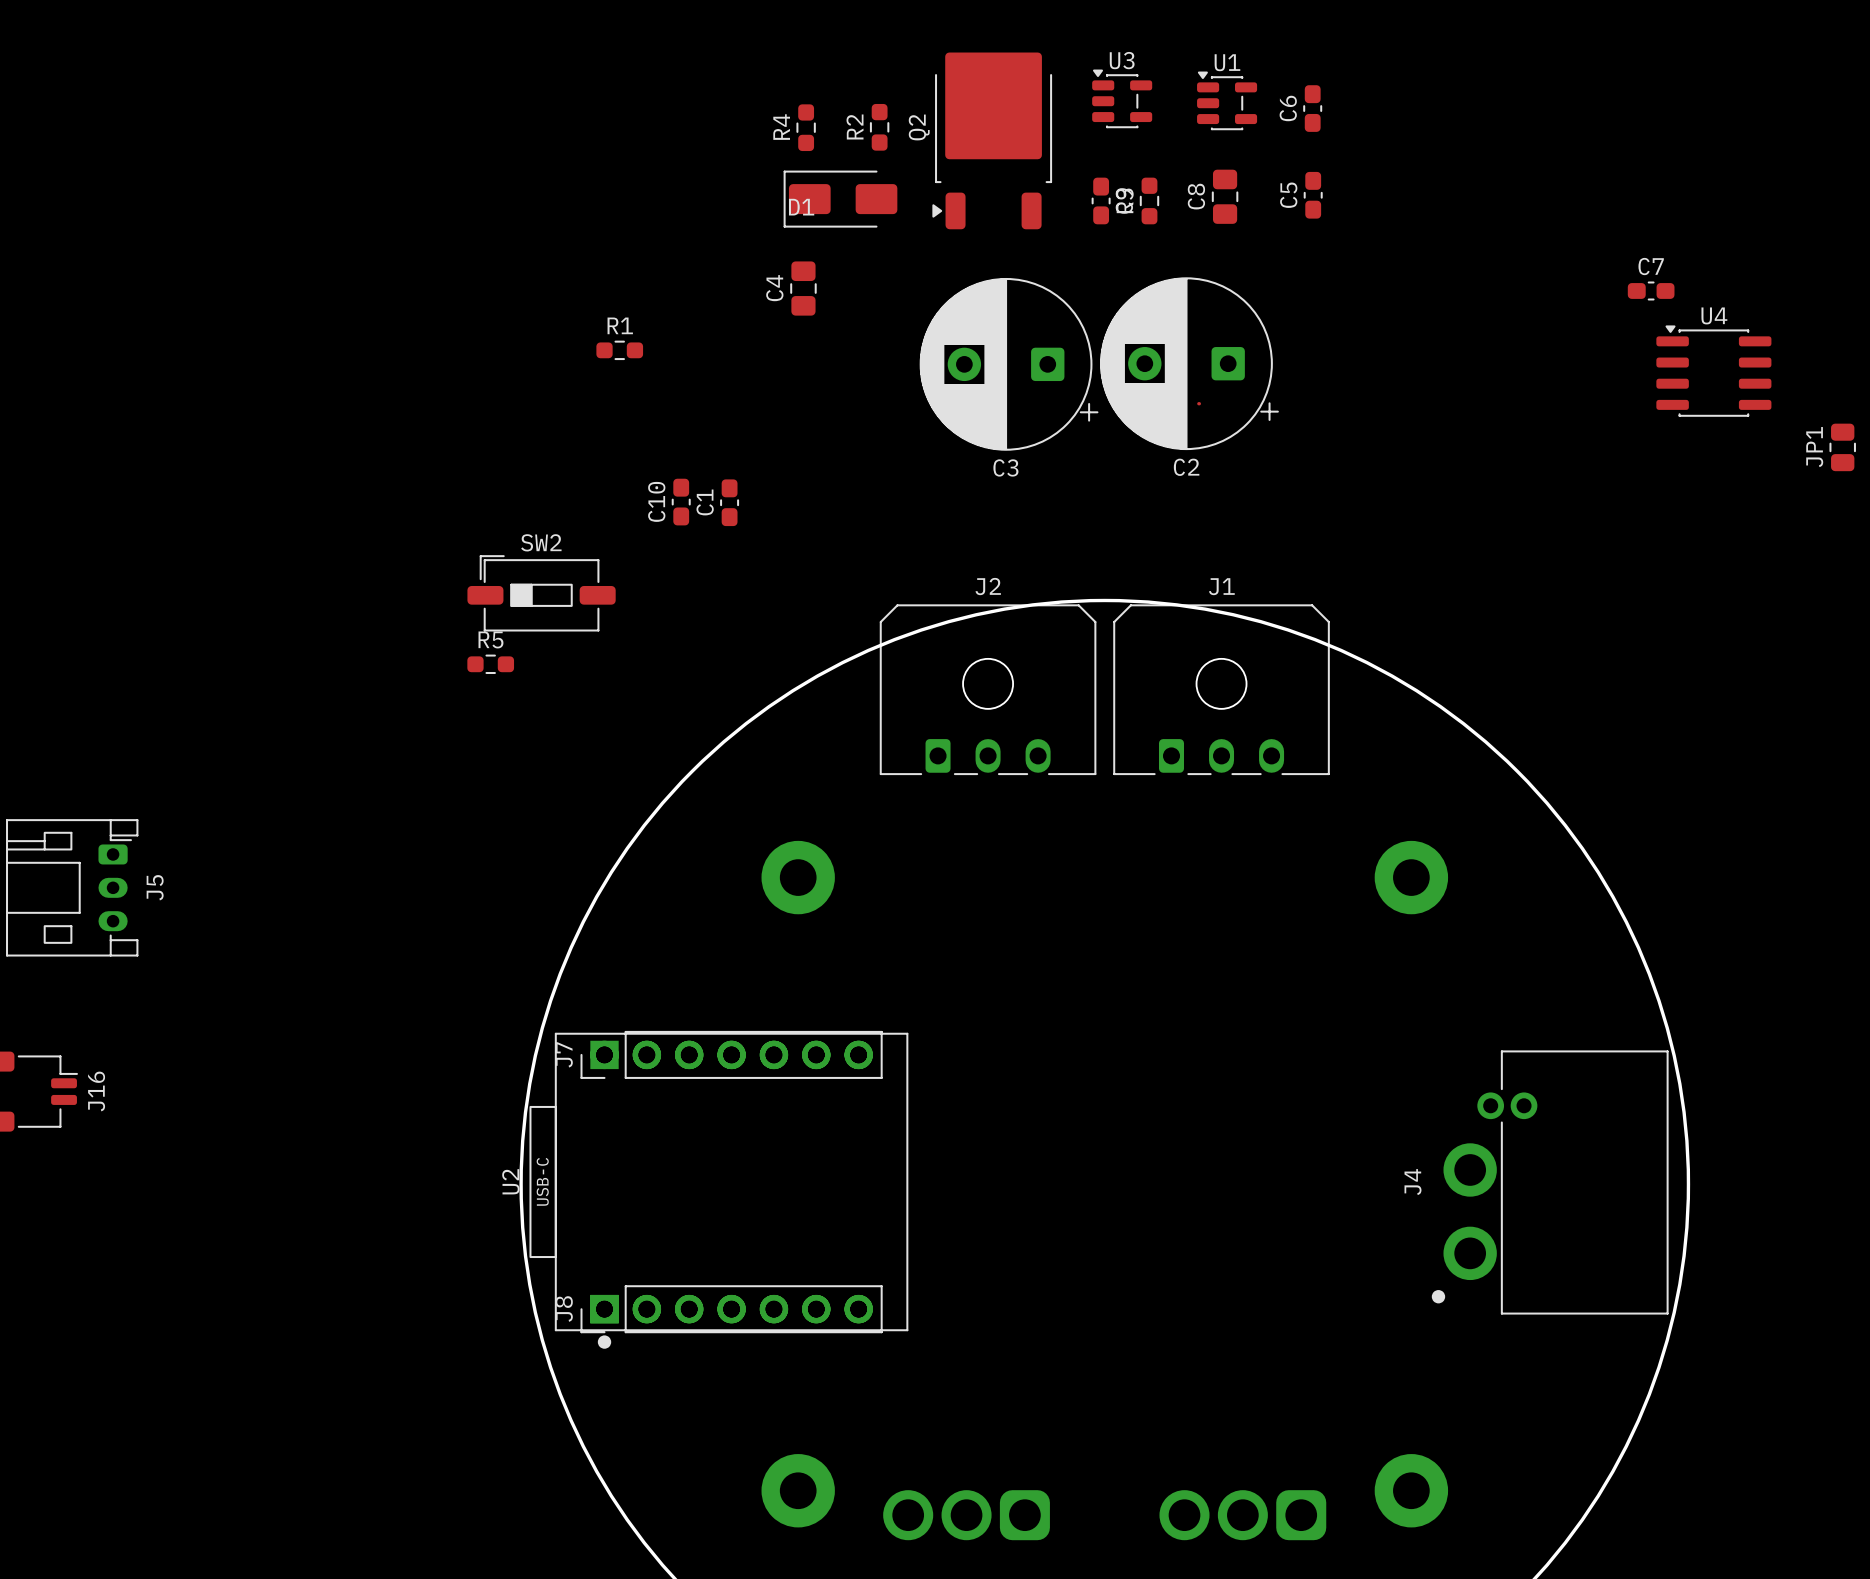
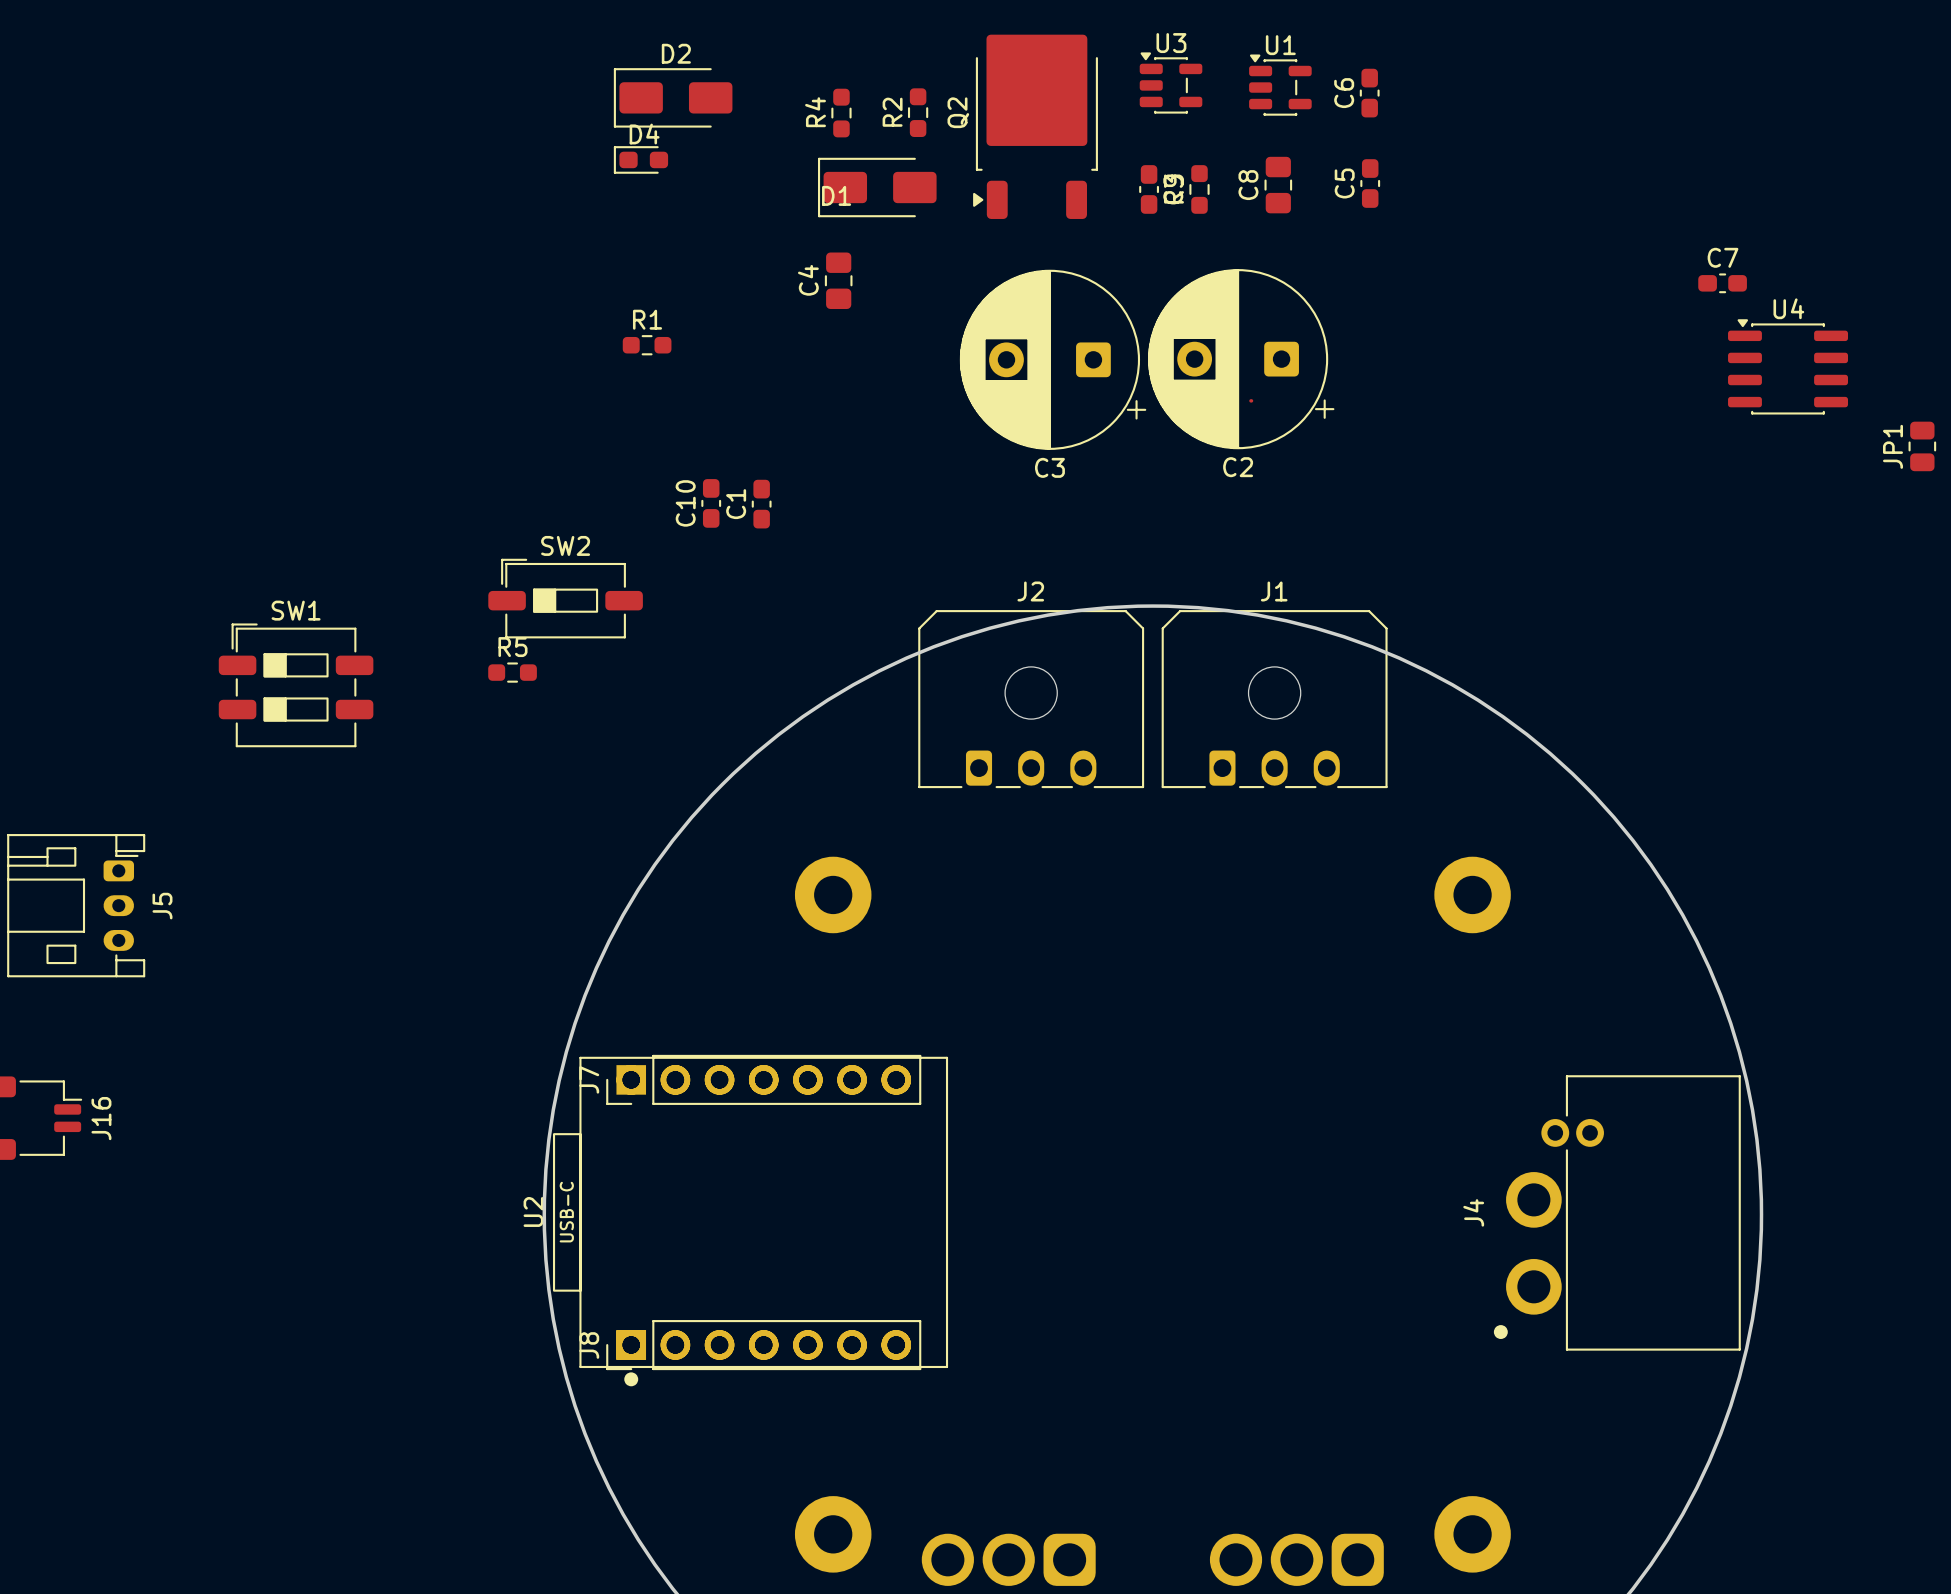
D2: none -> (673, 97)
D4: none -> (640, 159)
SW1: none -> (296, 685)

